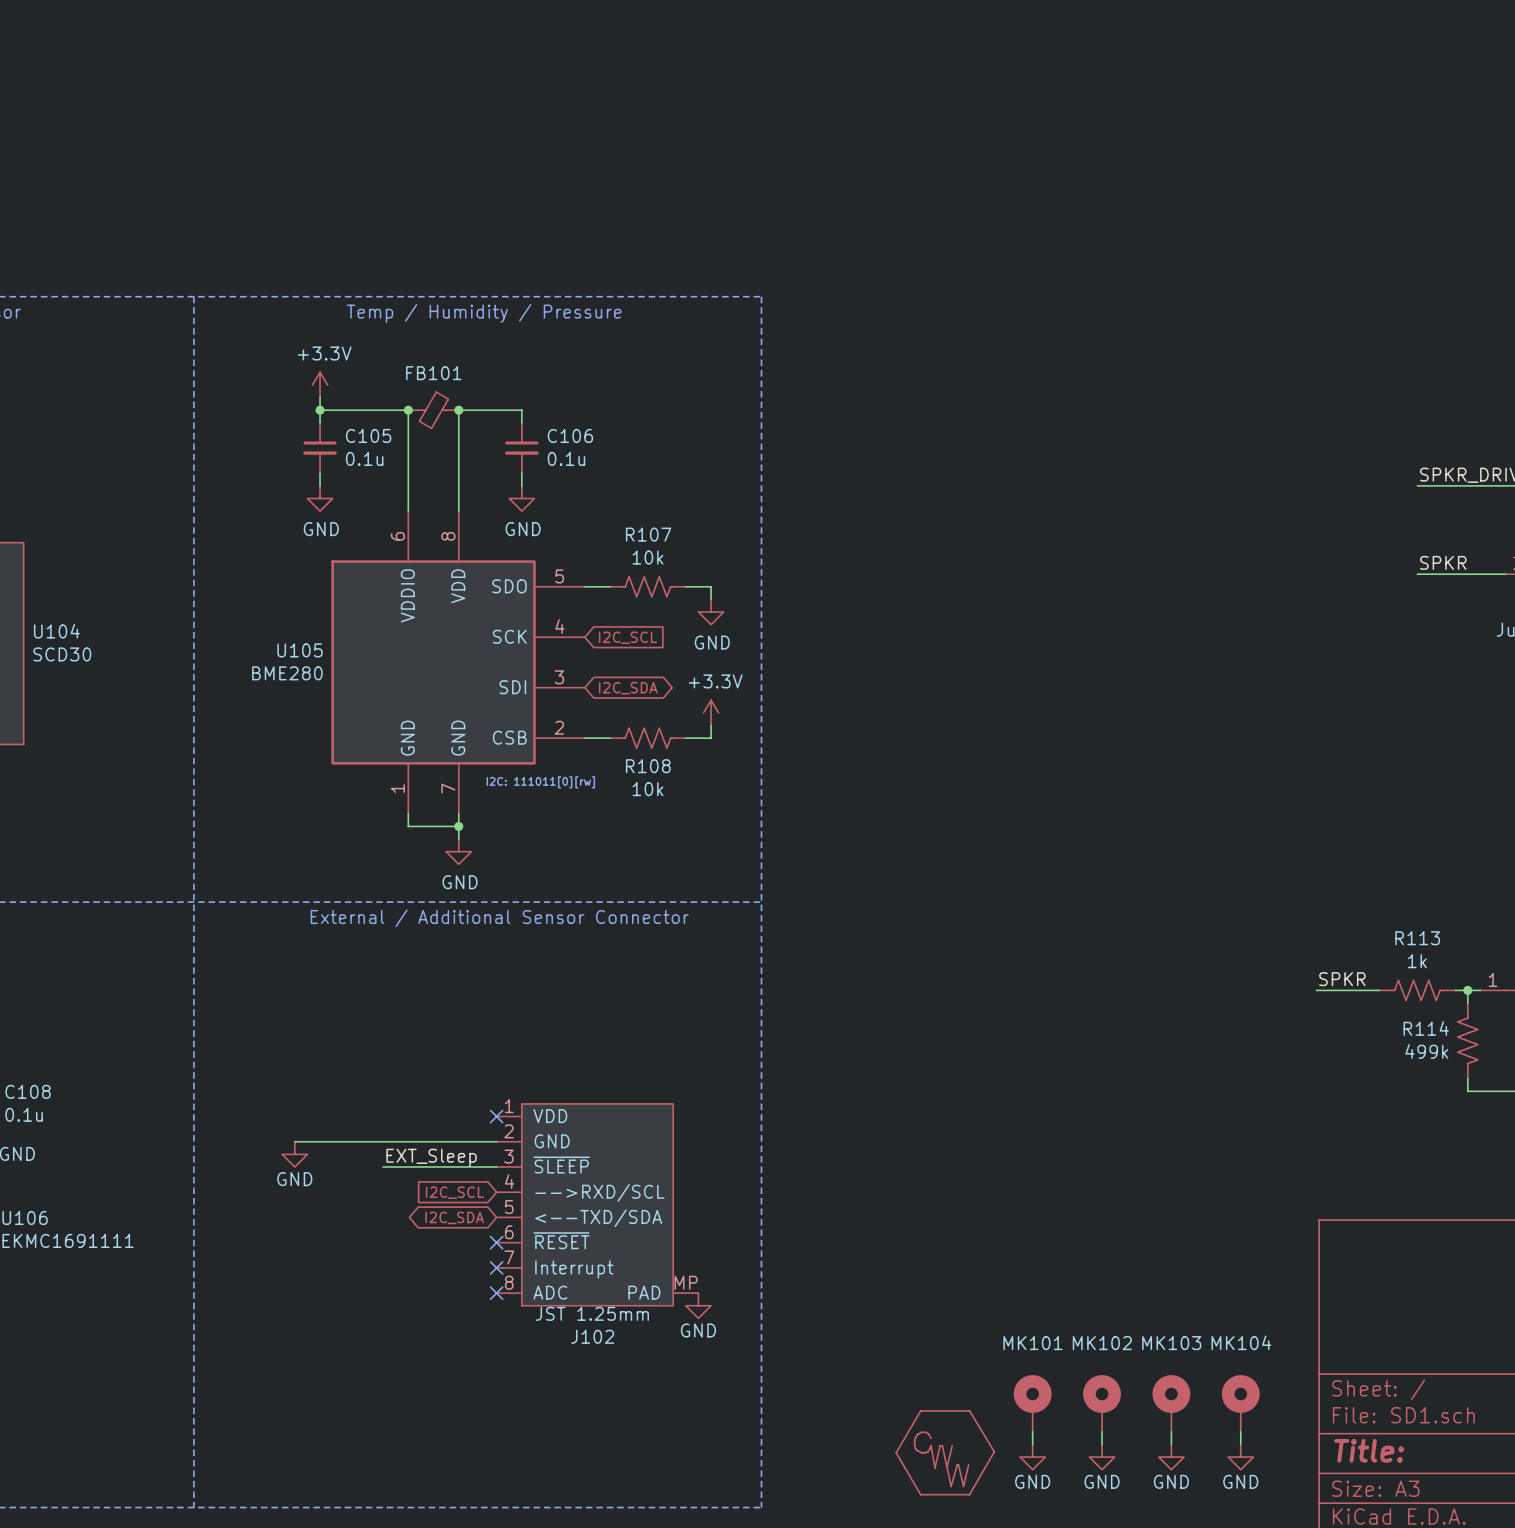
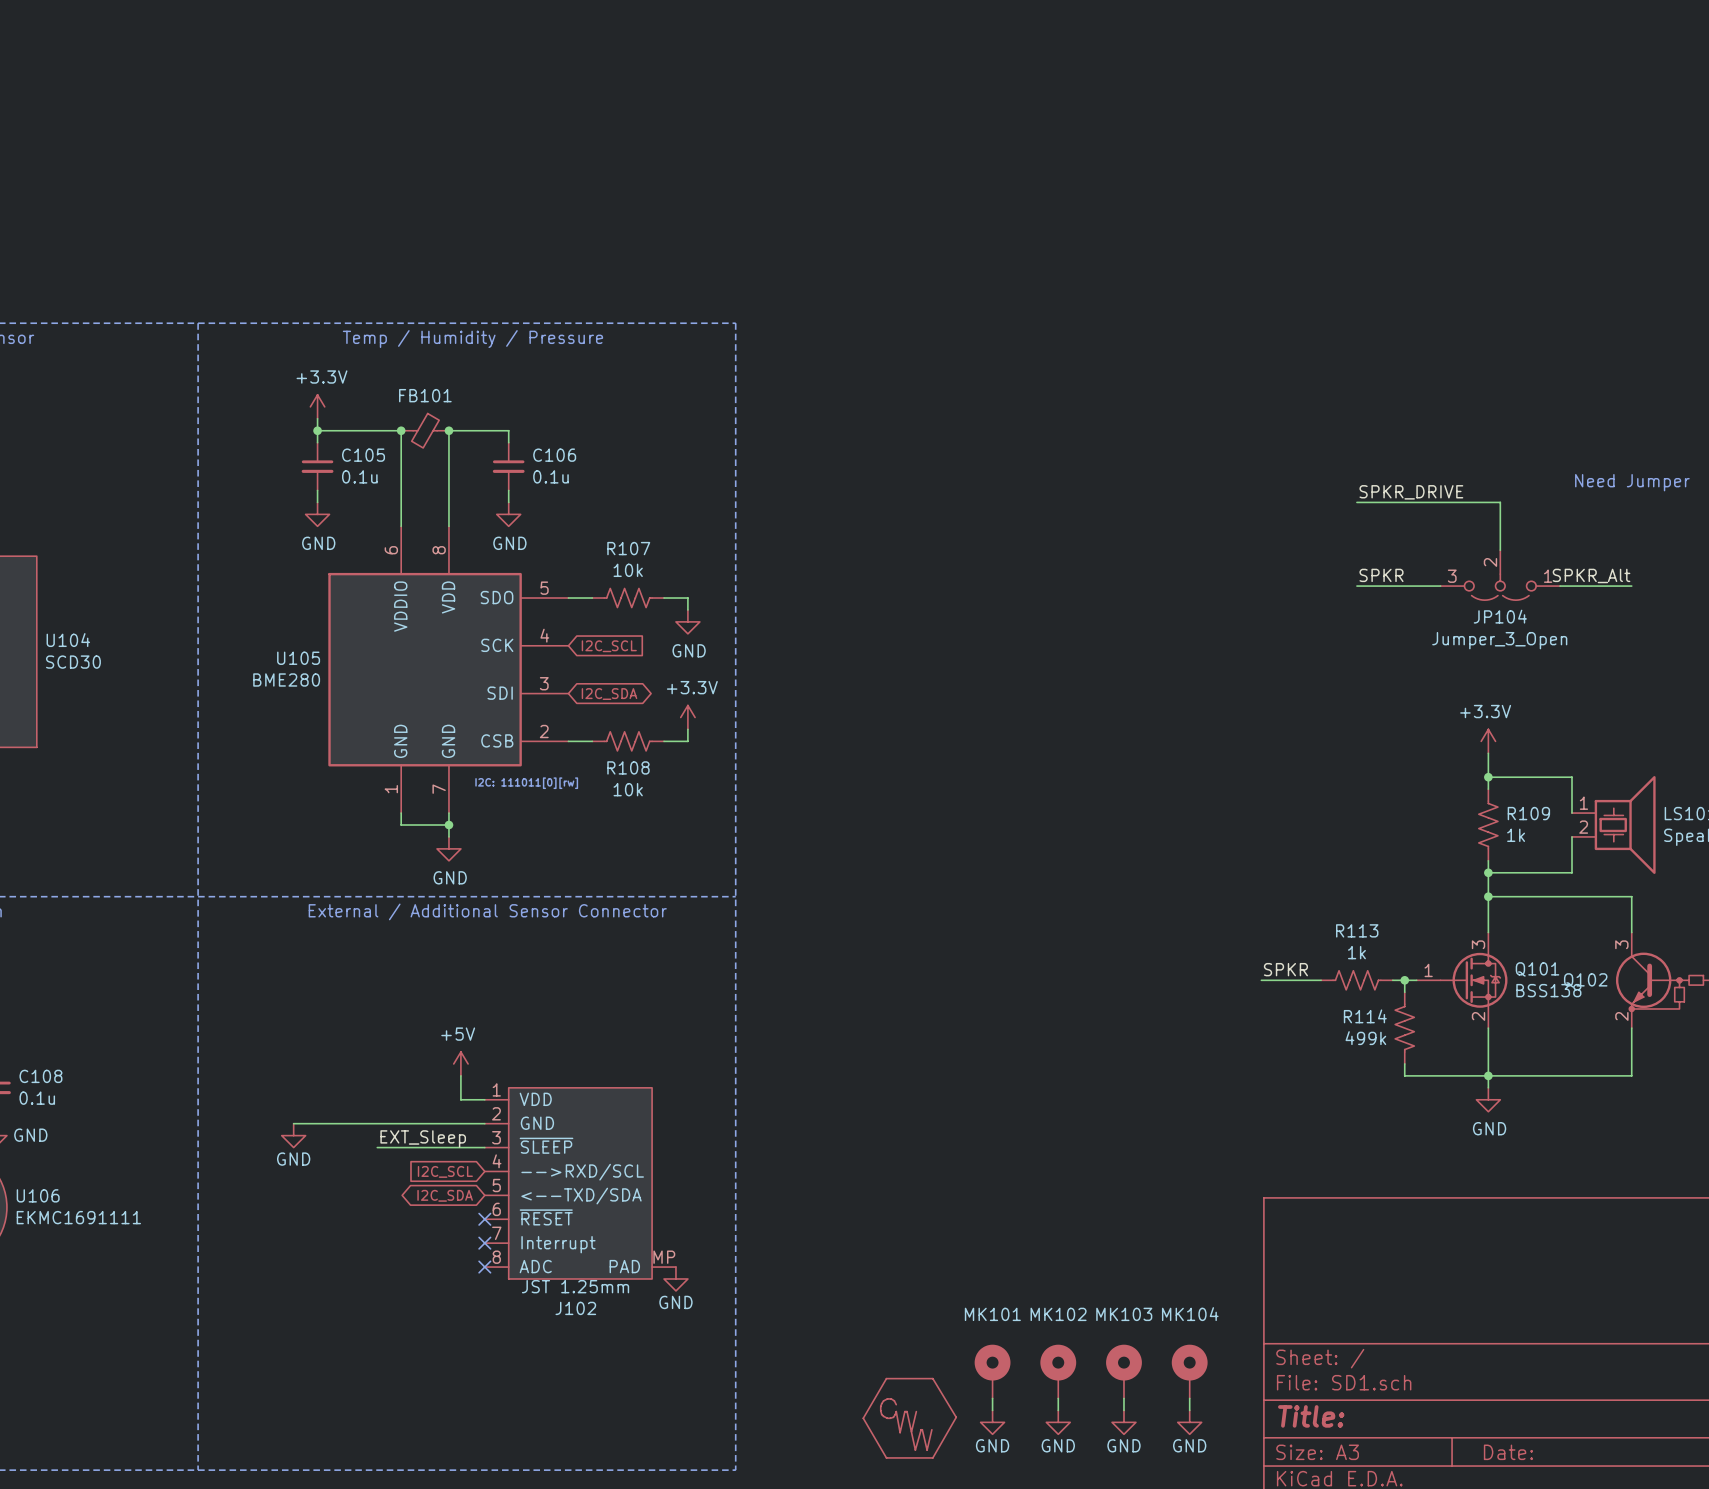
power symbol: none -> +5V (460, 1063)
wire: none -> (460, 1075) (460, 1099) (484, 1099)
no-connect mark: (496, 1116) -> none

